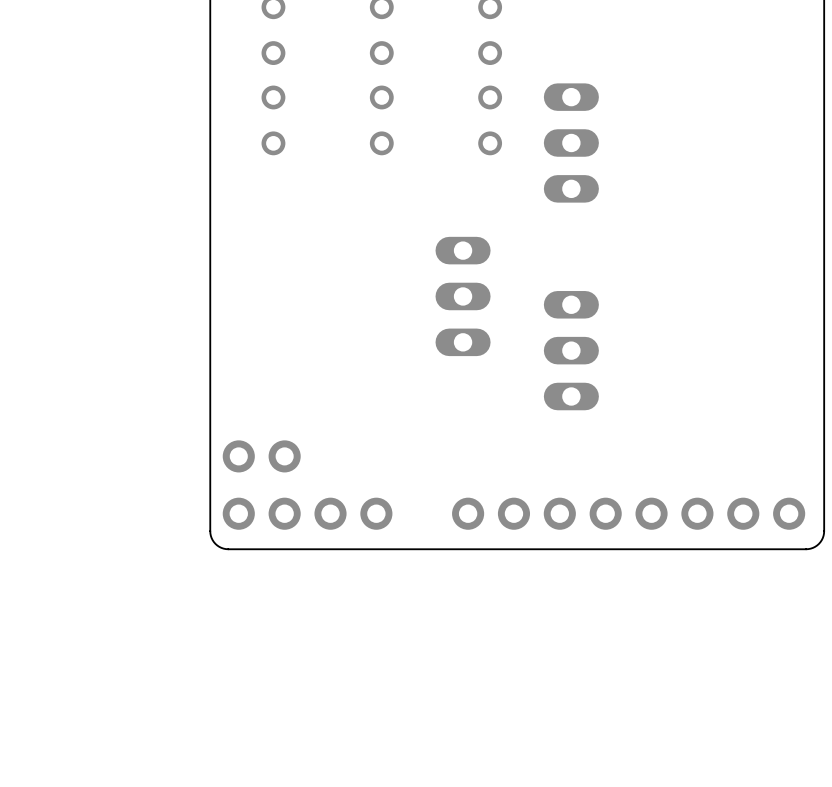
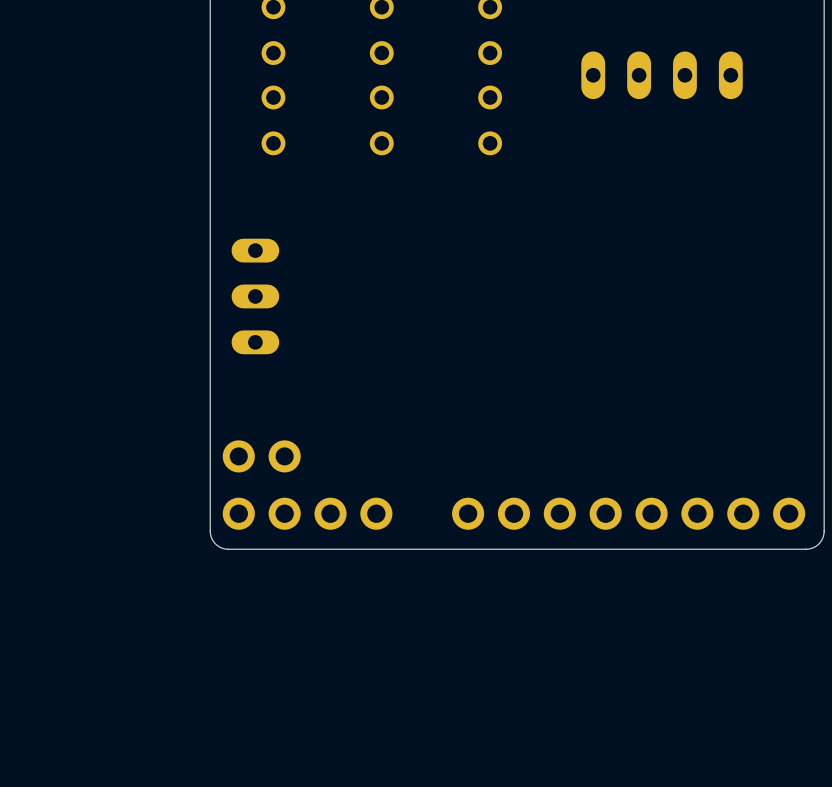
part: none -> (662, 75)
part: (571, 142) -> none
part: none -> (255, 296)
part: (463, 296) -> none
part: (571, 350) -> none

